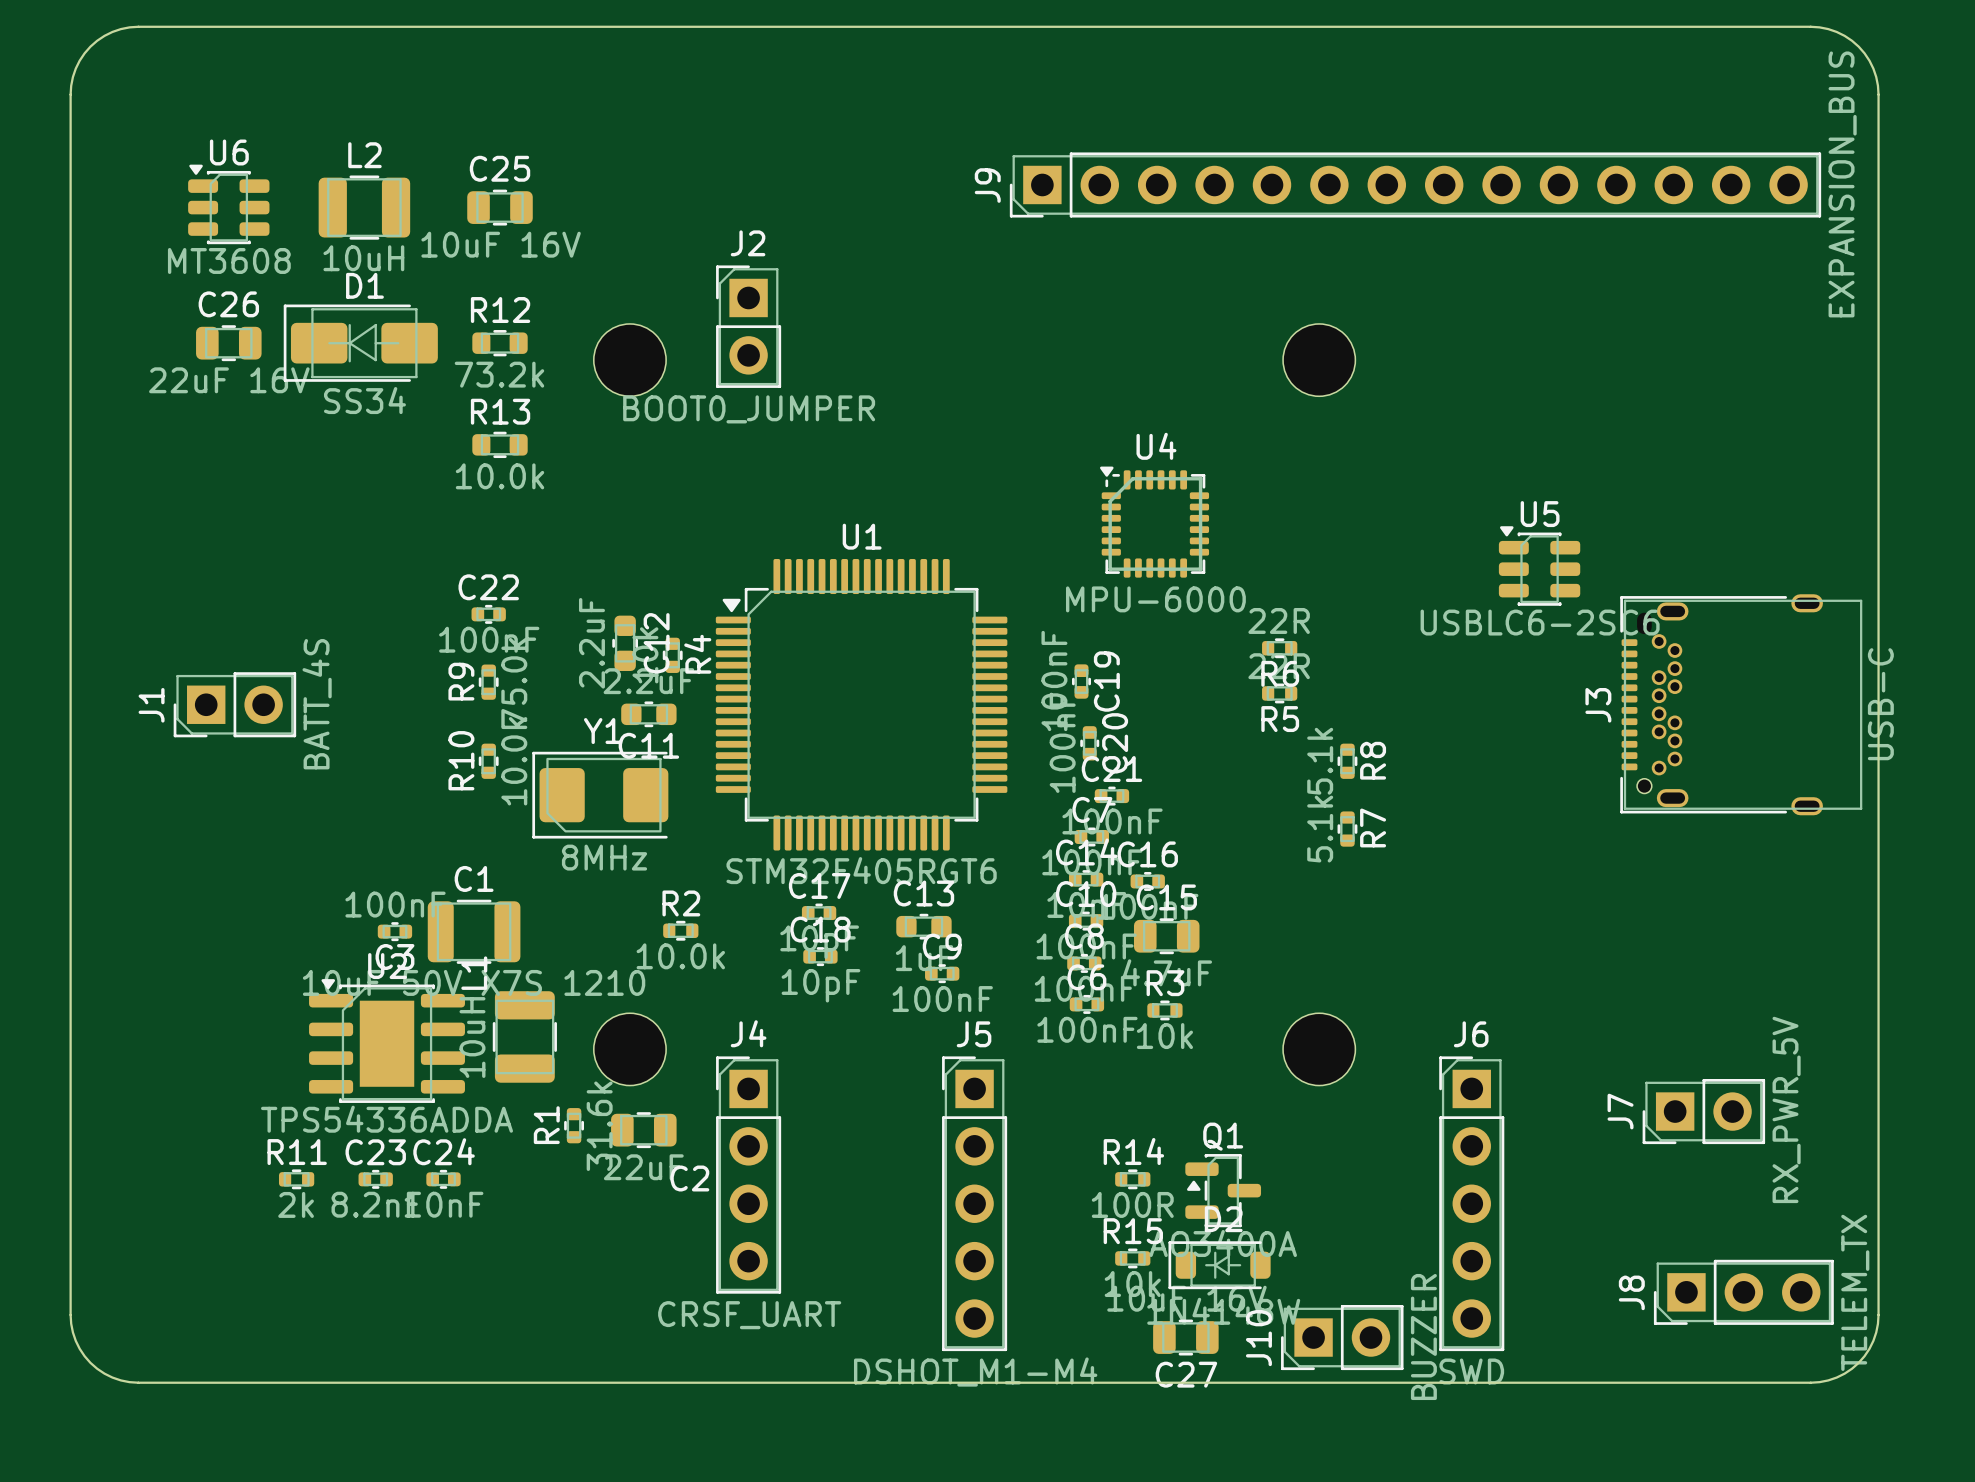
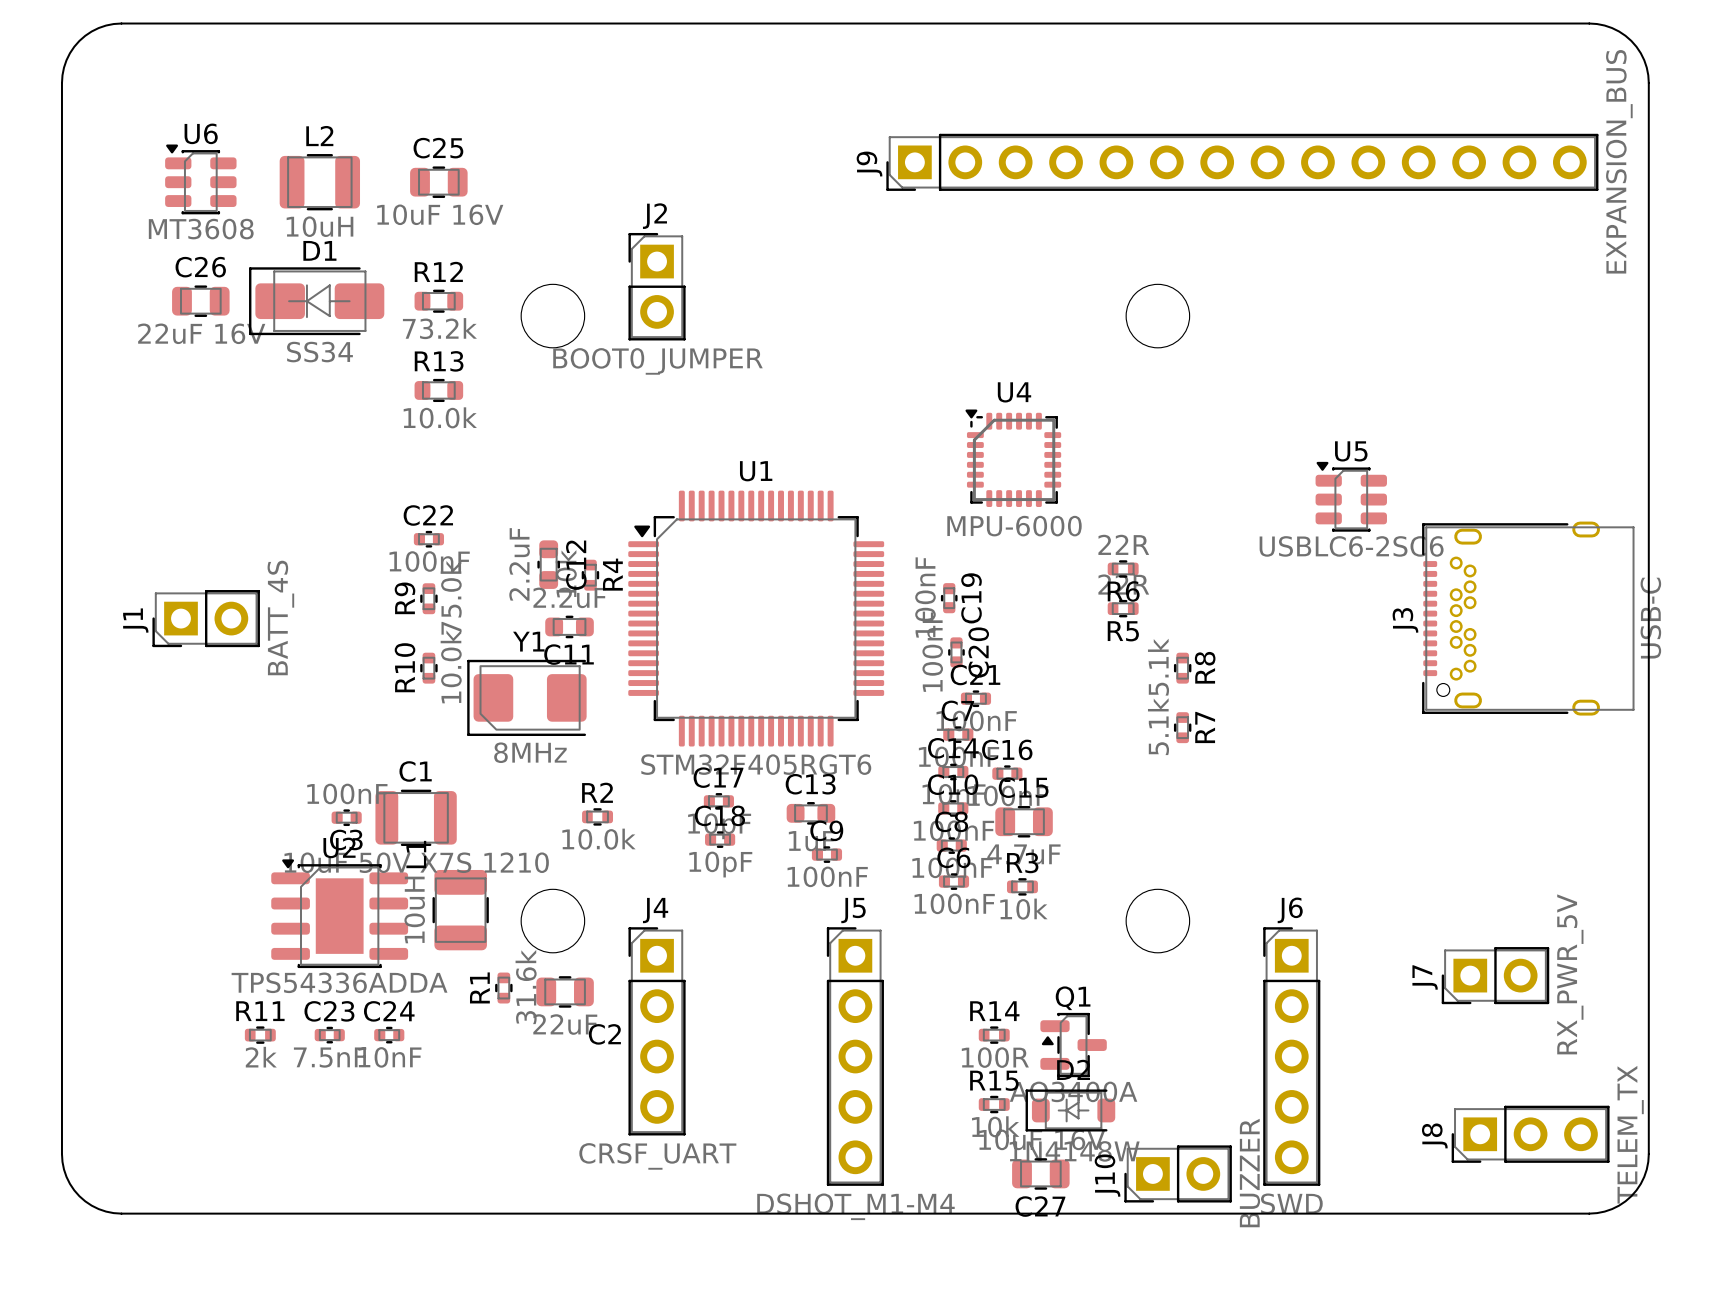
C23 value: 8.2nF (376, 1204) -> 7.5nF (330, 1057)

